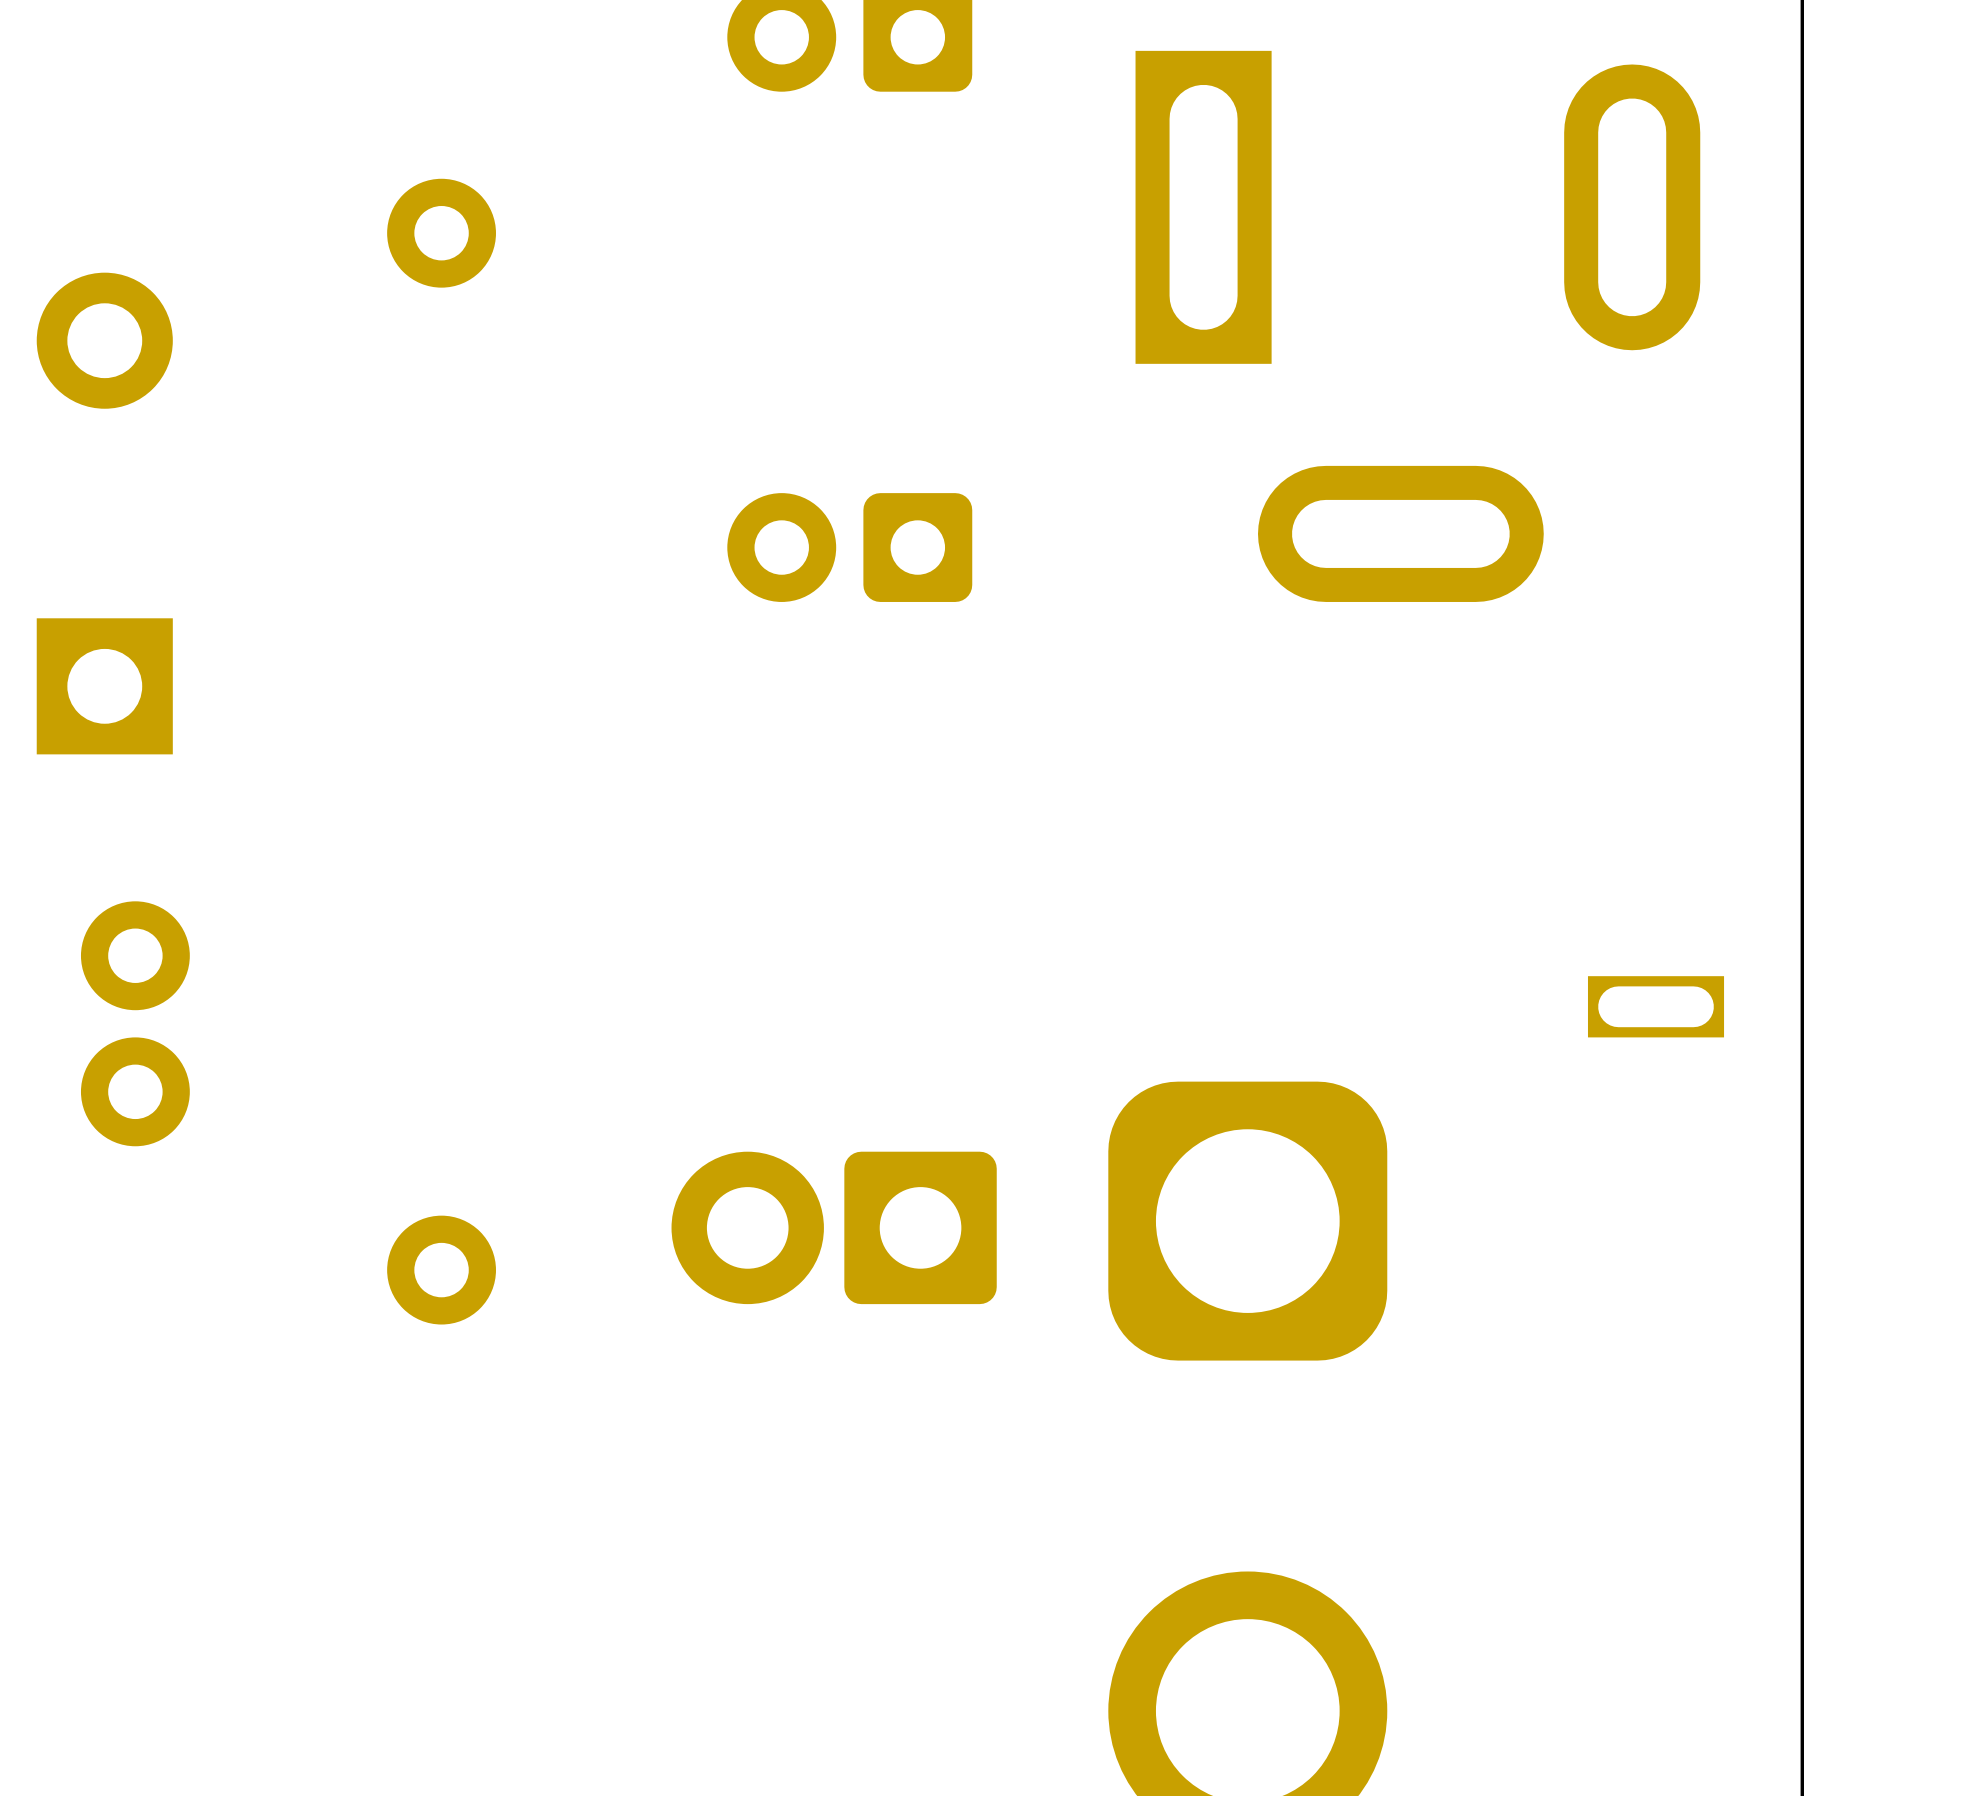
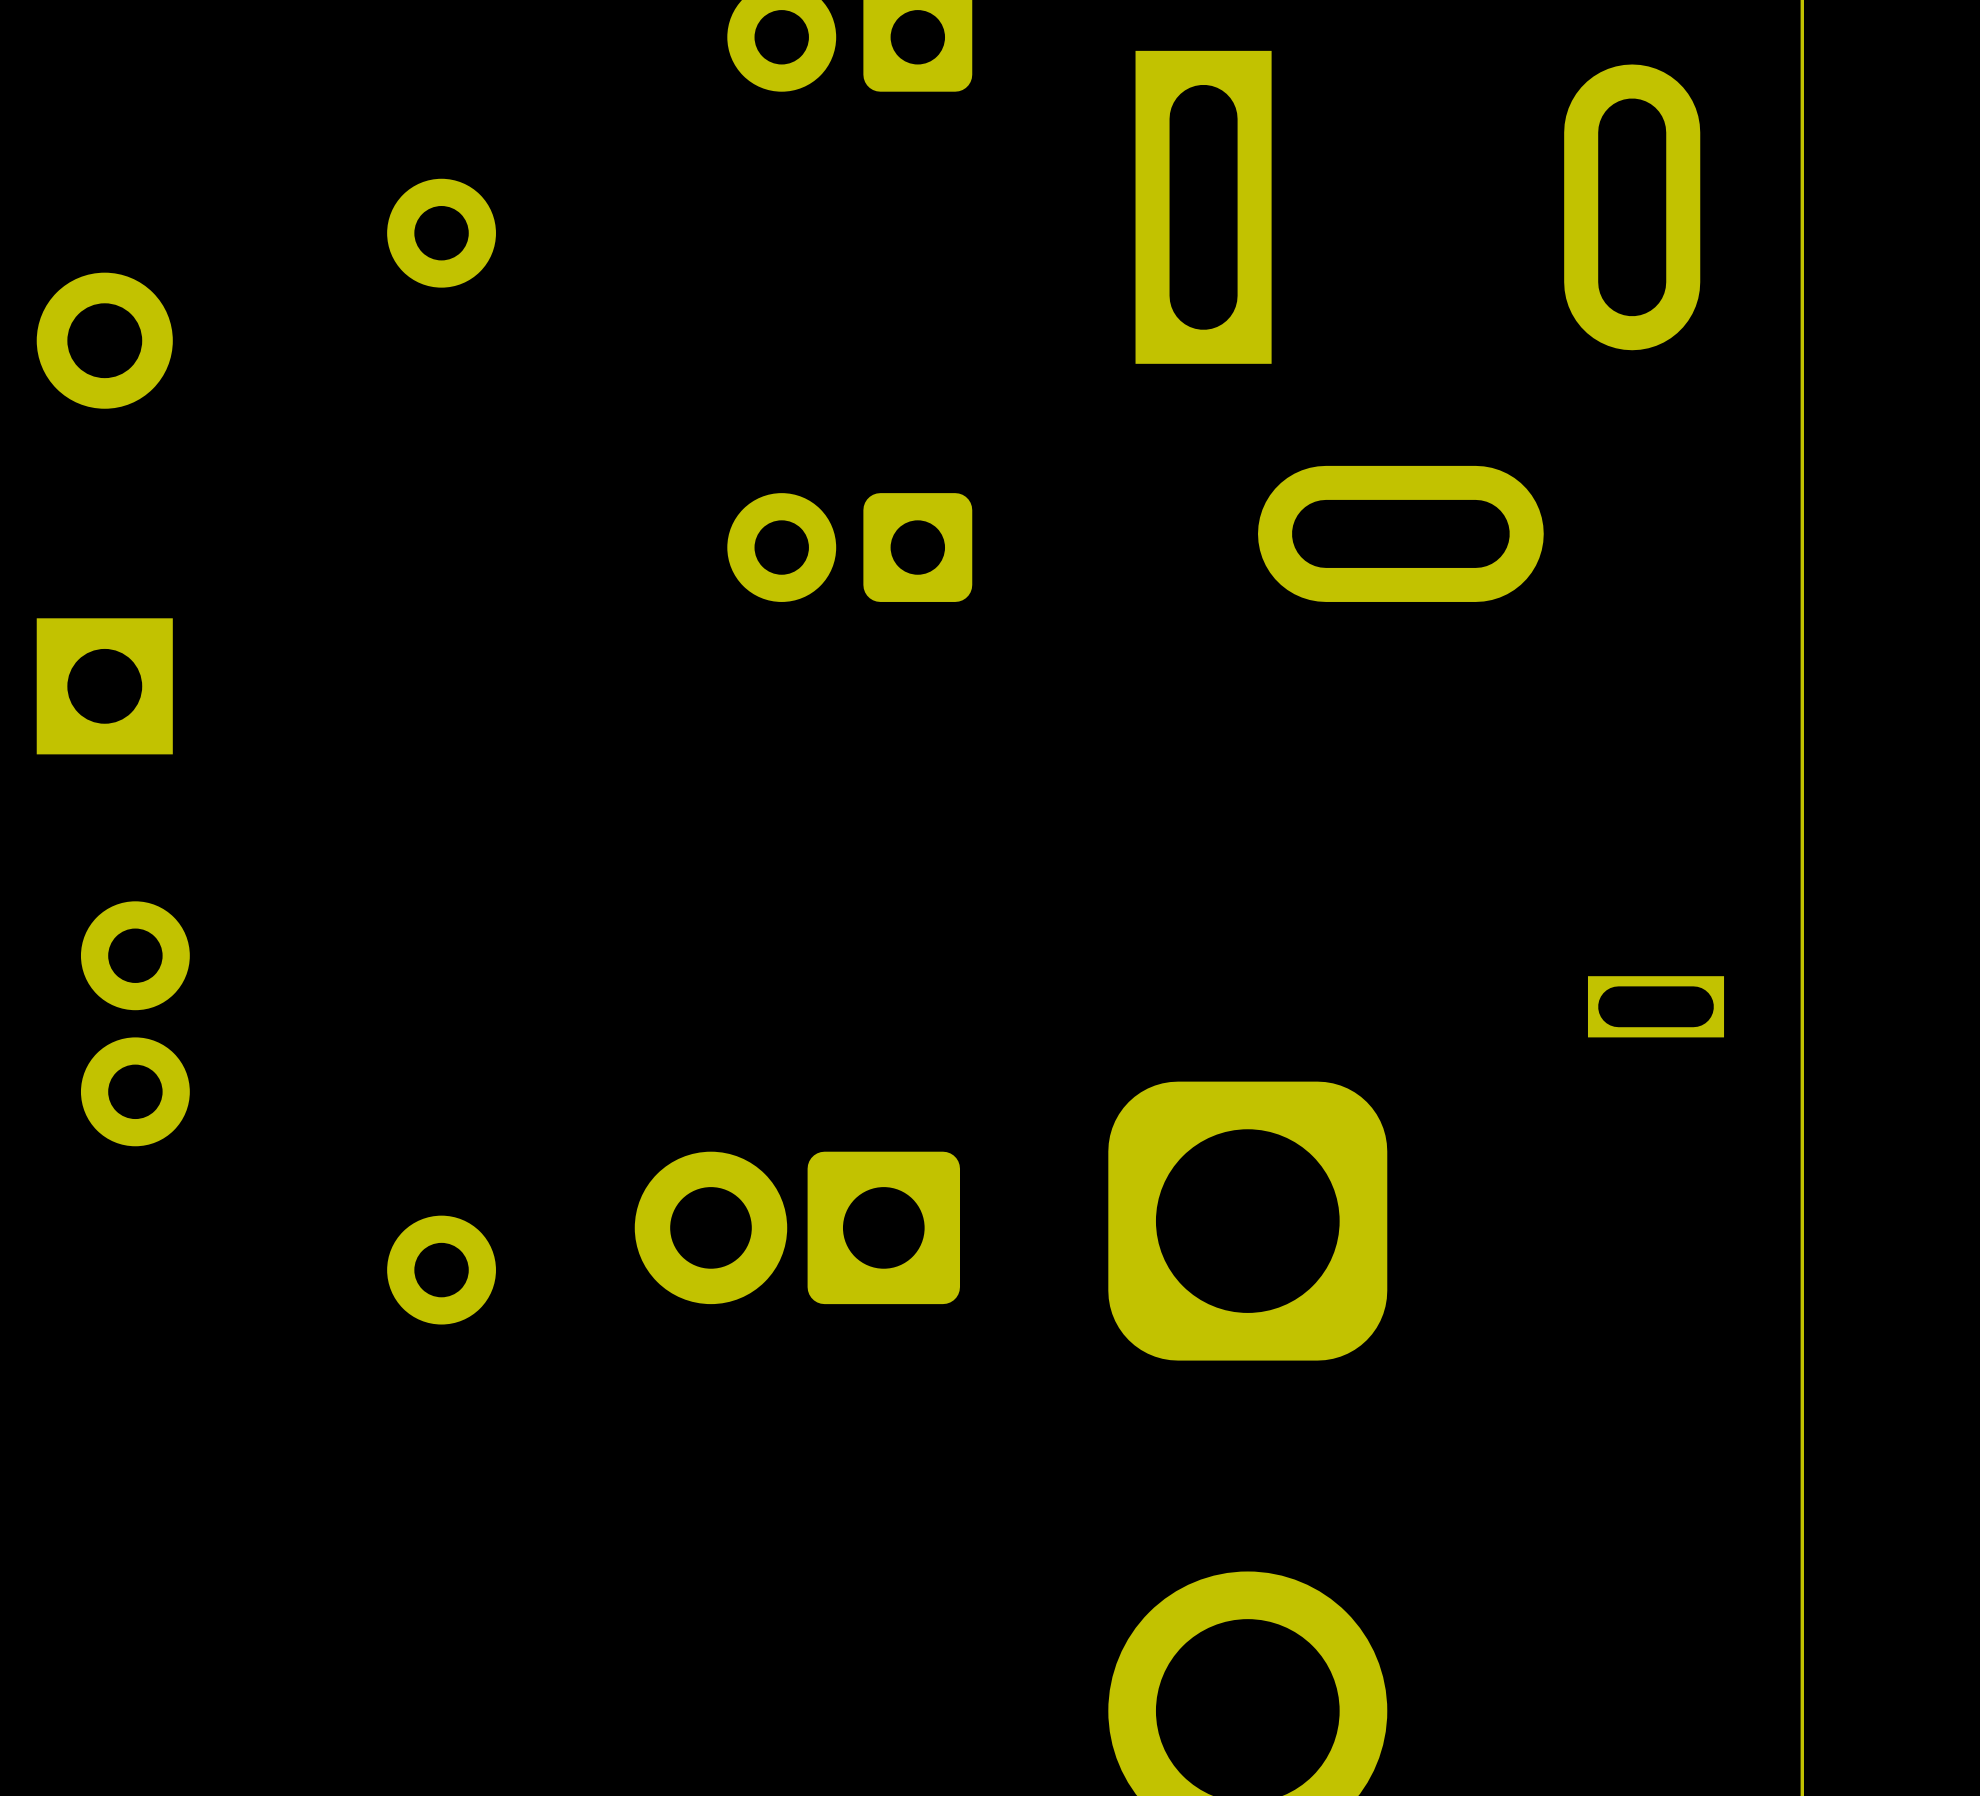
part position: (834, 1227) -> (797, 1227)

